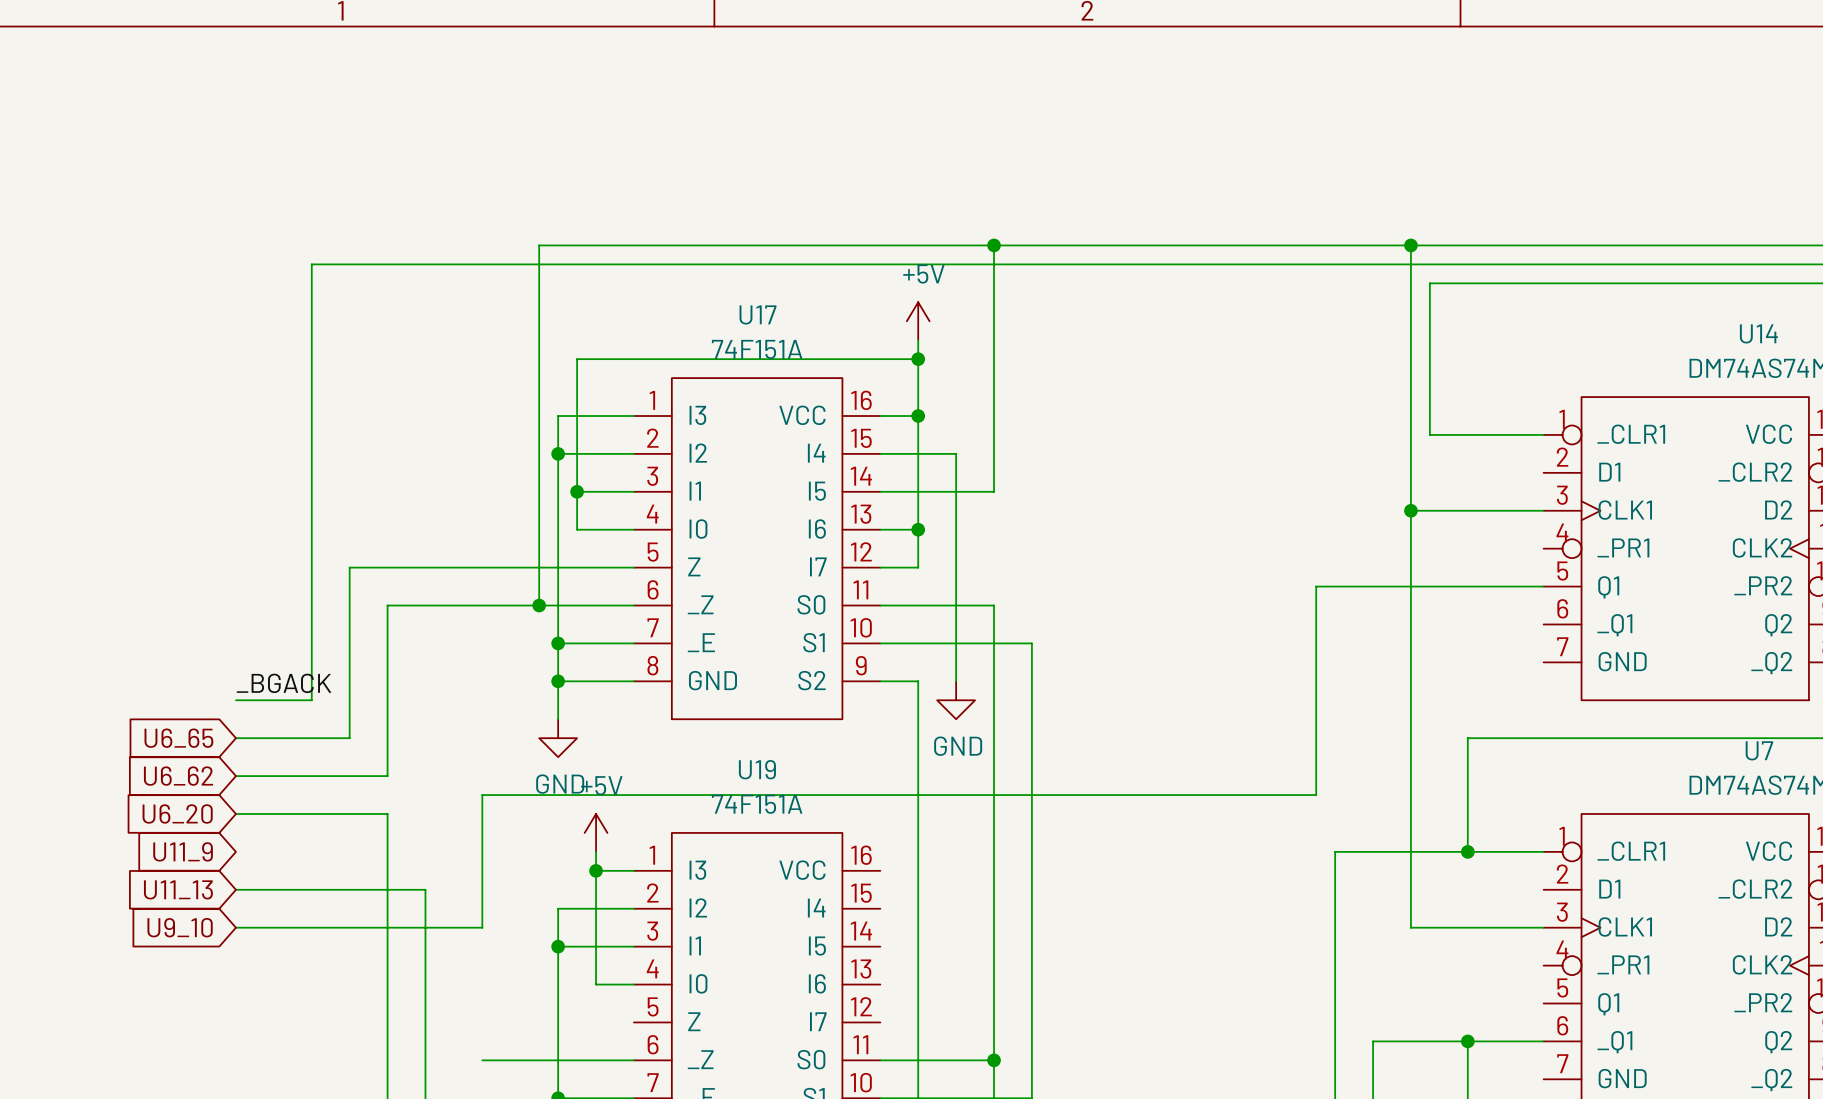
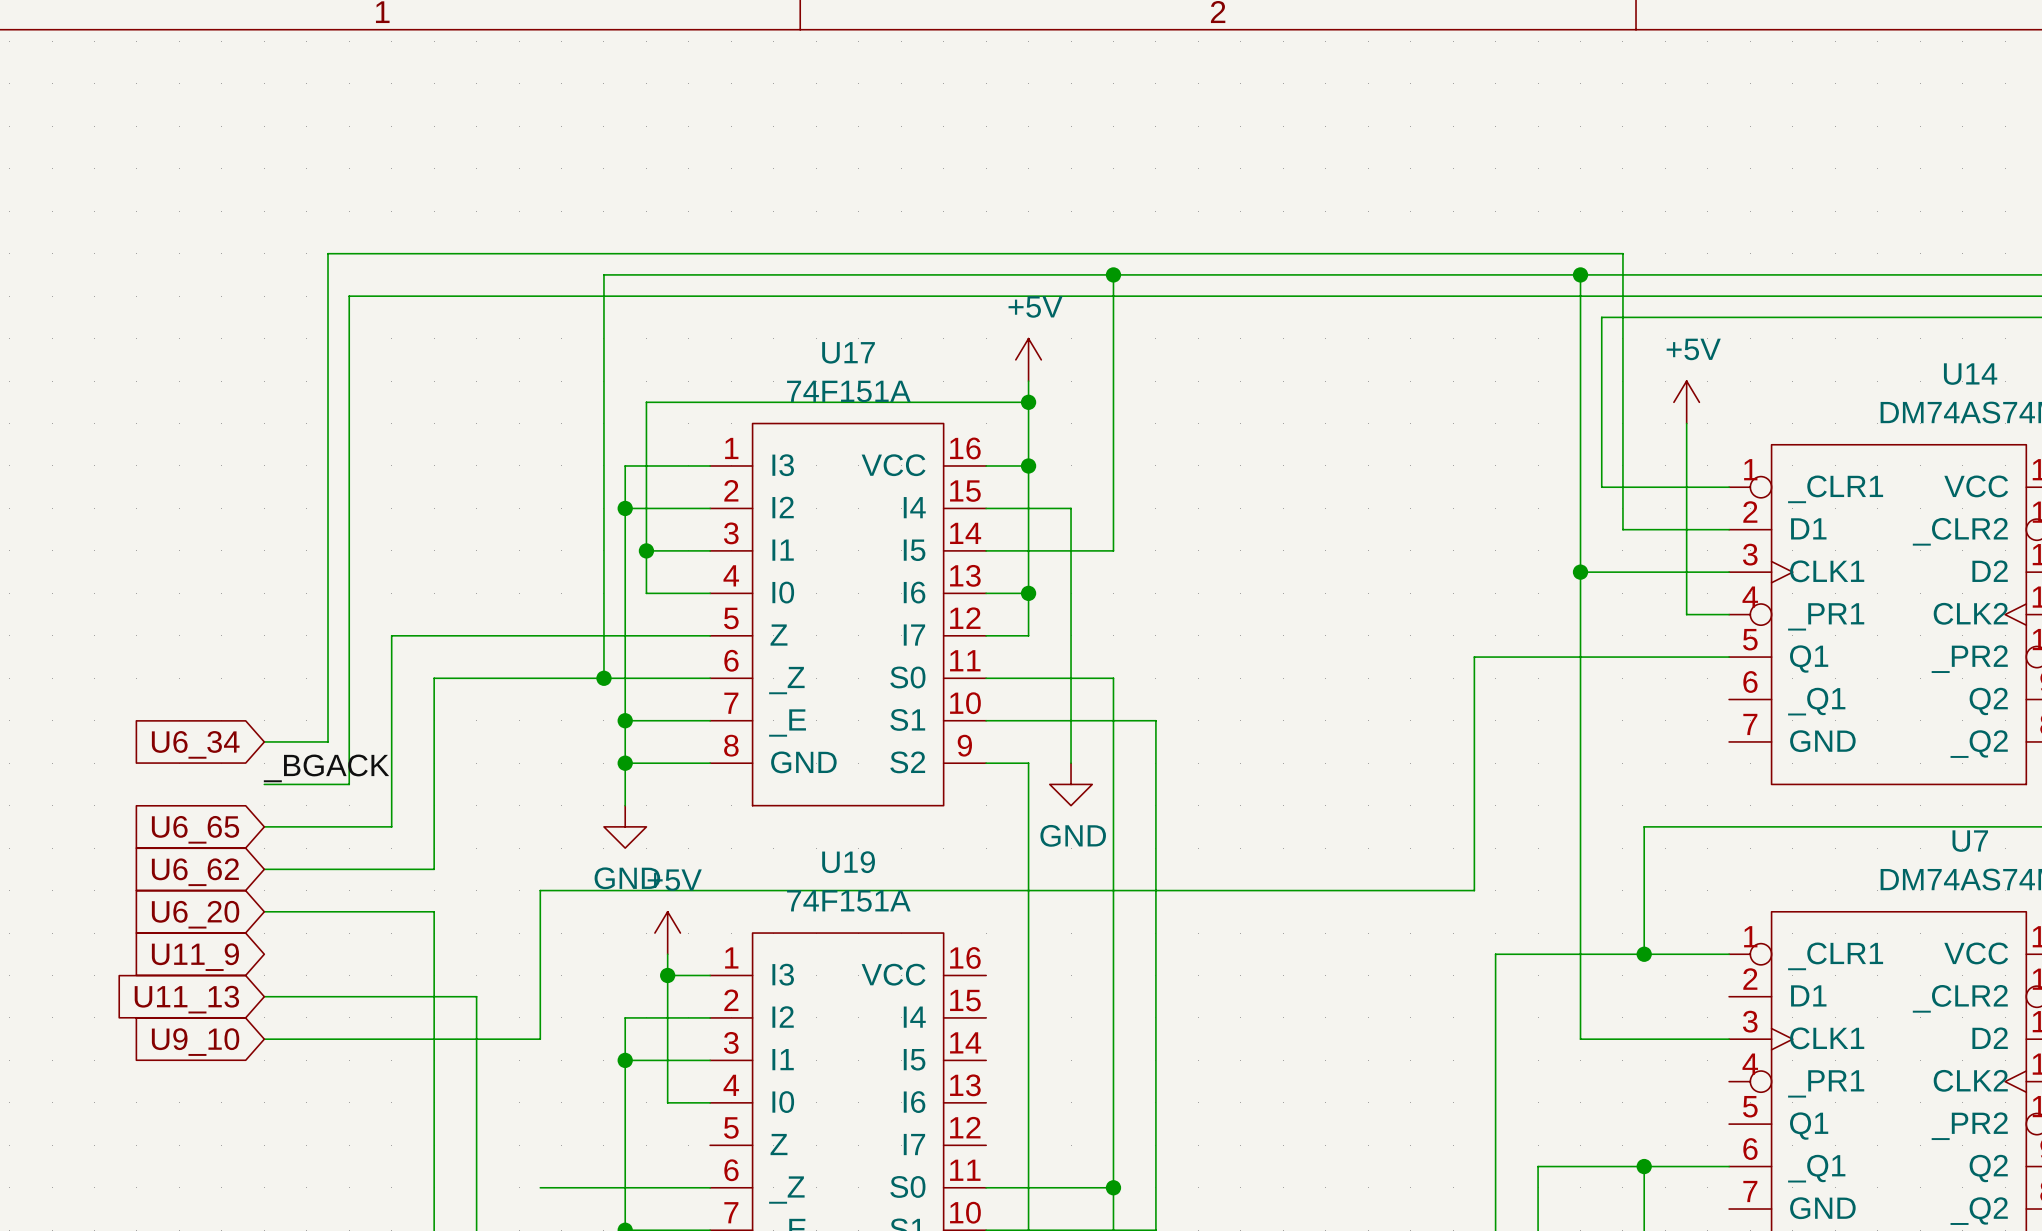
power symbol: none -> +5V (1686, 402)
wire: none -> (1686, 423) (1686, 614) (1729, 614)
wire: none -> (1729, 529) (1622, 529) (1622, 253) (328, 253) (328, 741) (264, 741)
global label: none -> U6_34 (195, 744)

